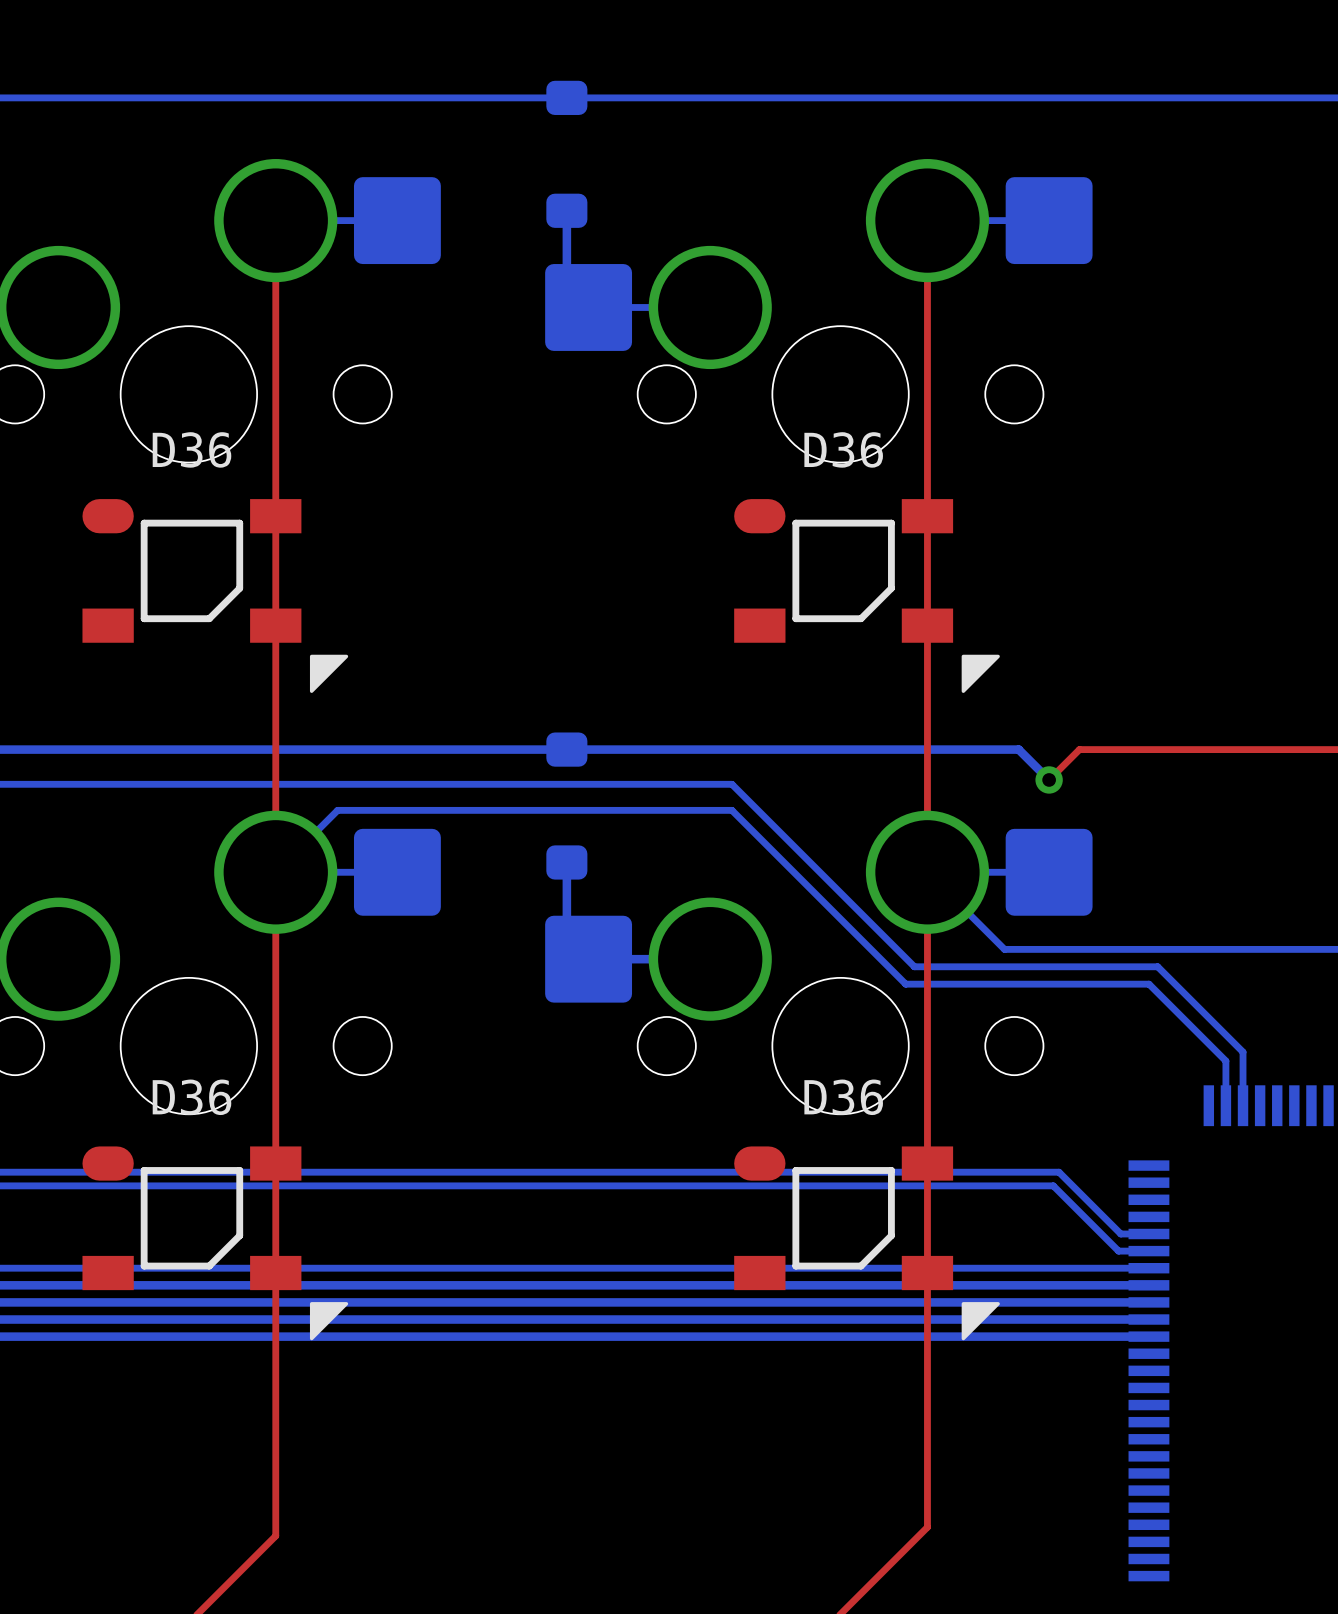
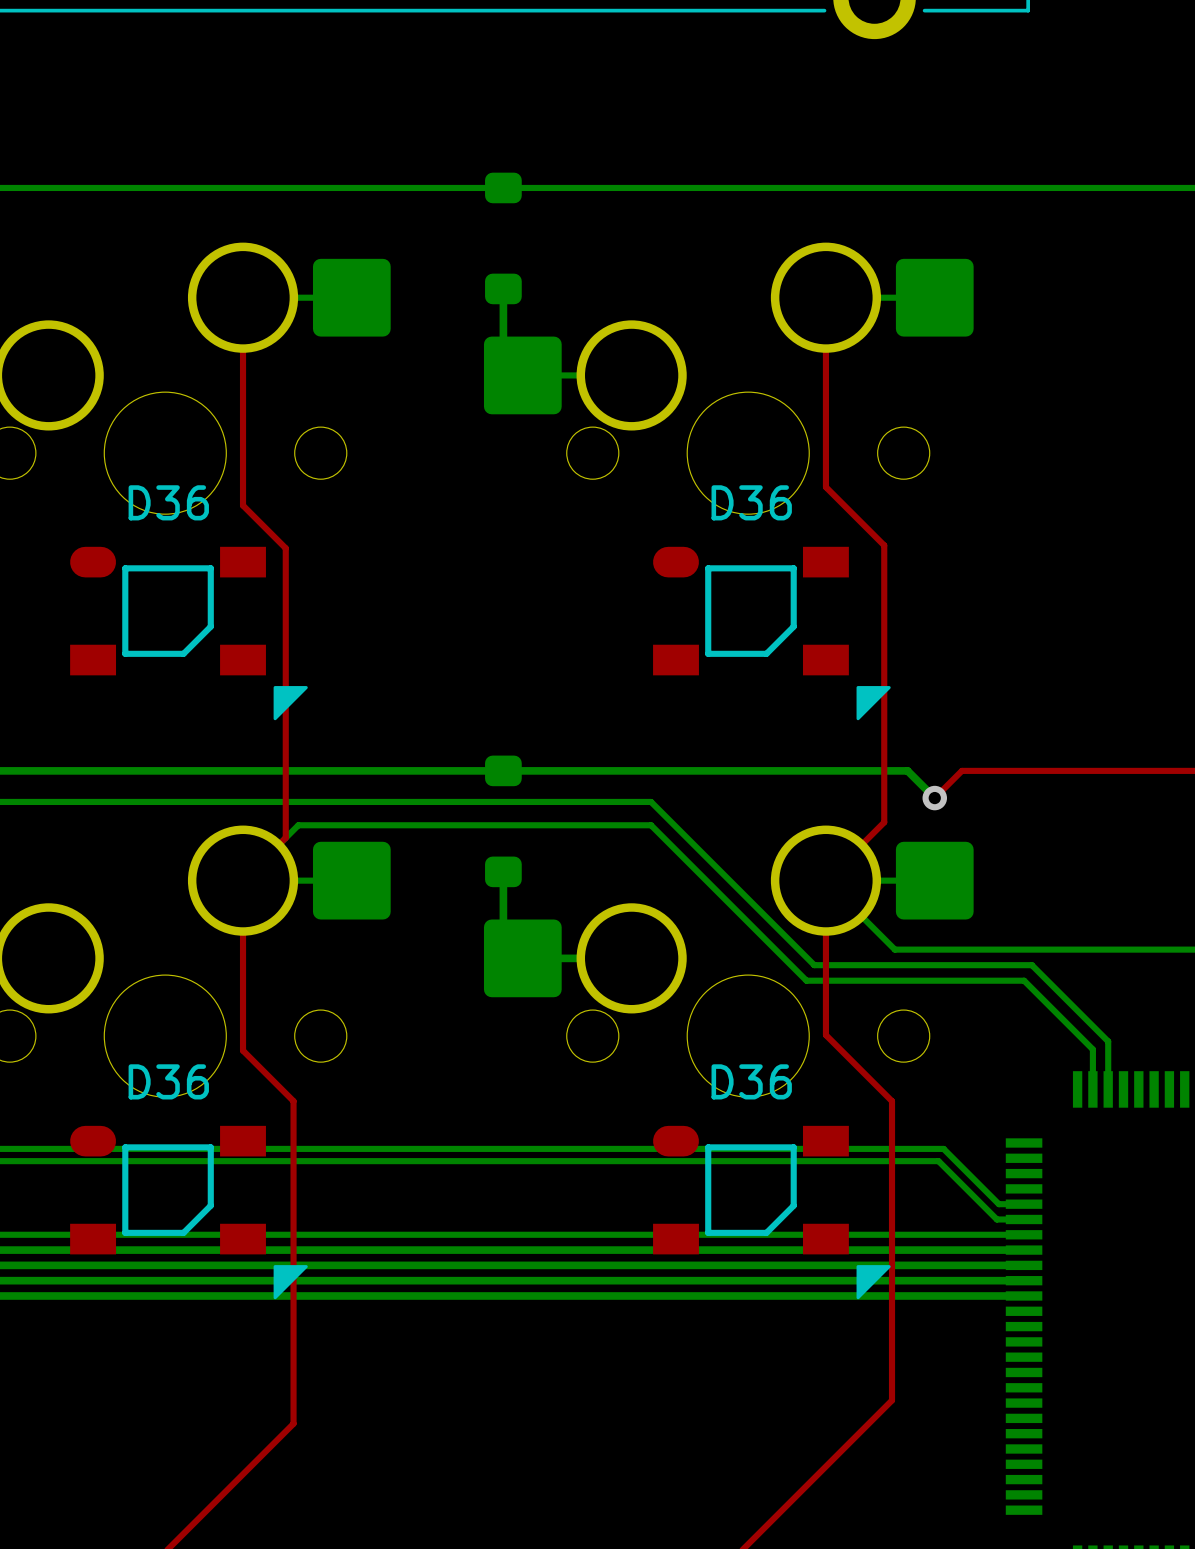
top track: (927, 432) (927, 872) -> (825, 487) (884, 545) (884, 822) (825, 880)
top track: (275, 452) (275, 872) -> (243, 505) (285, 548) (285, 837) (243, 880)
top track: (927, 1044) (927, 1527) -> (825, 1035) (892, 1101) (892, 1400) (825, 1466)
top track: (275, 1062) (275, 1535) -> (243, 1050) (293, 1101) (293, 1423) (243, 1474)

